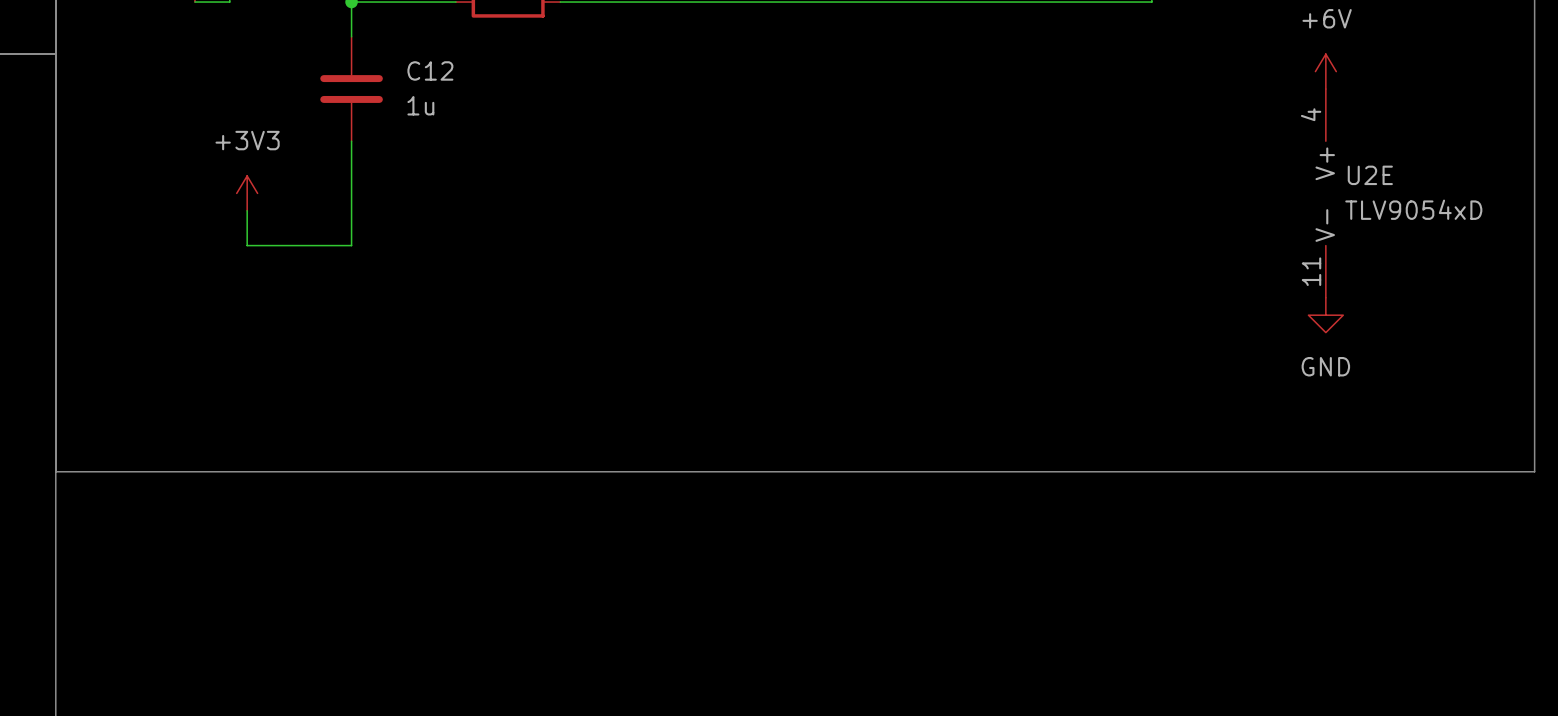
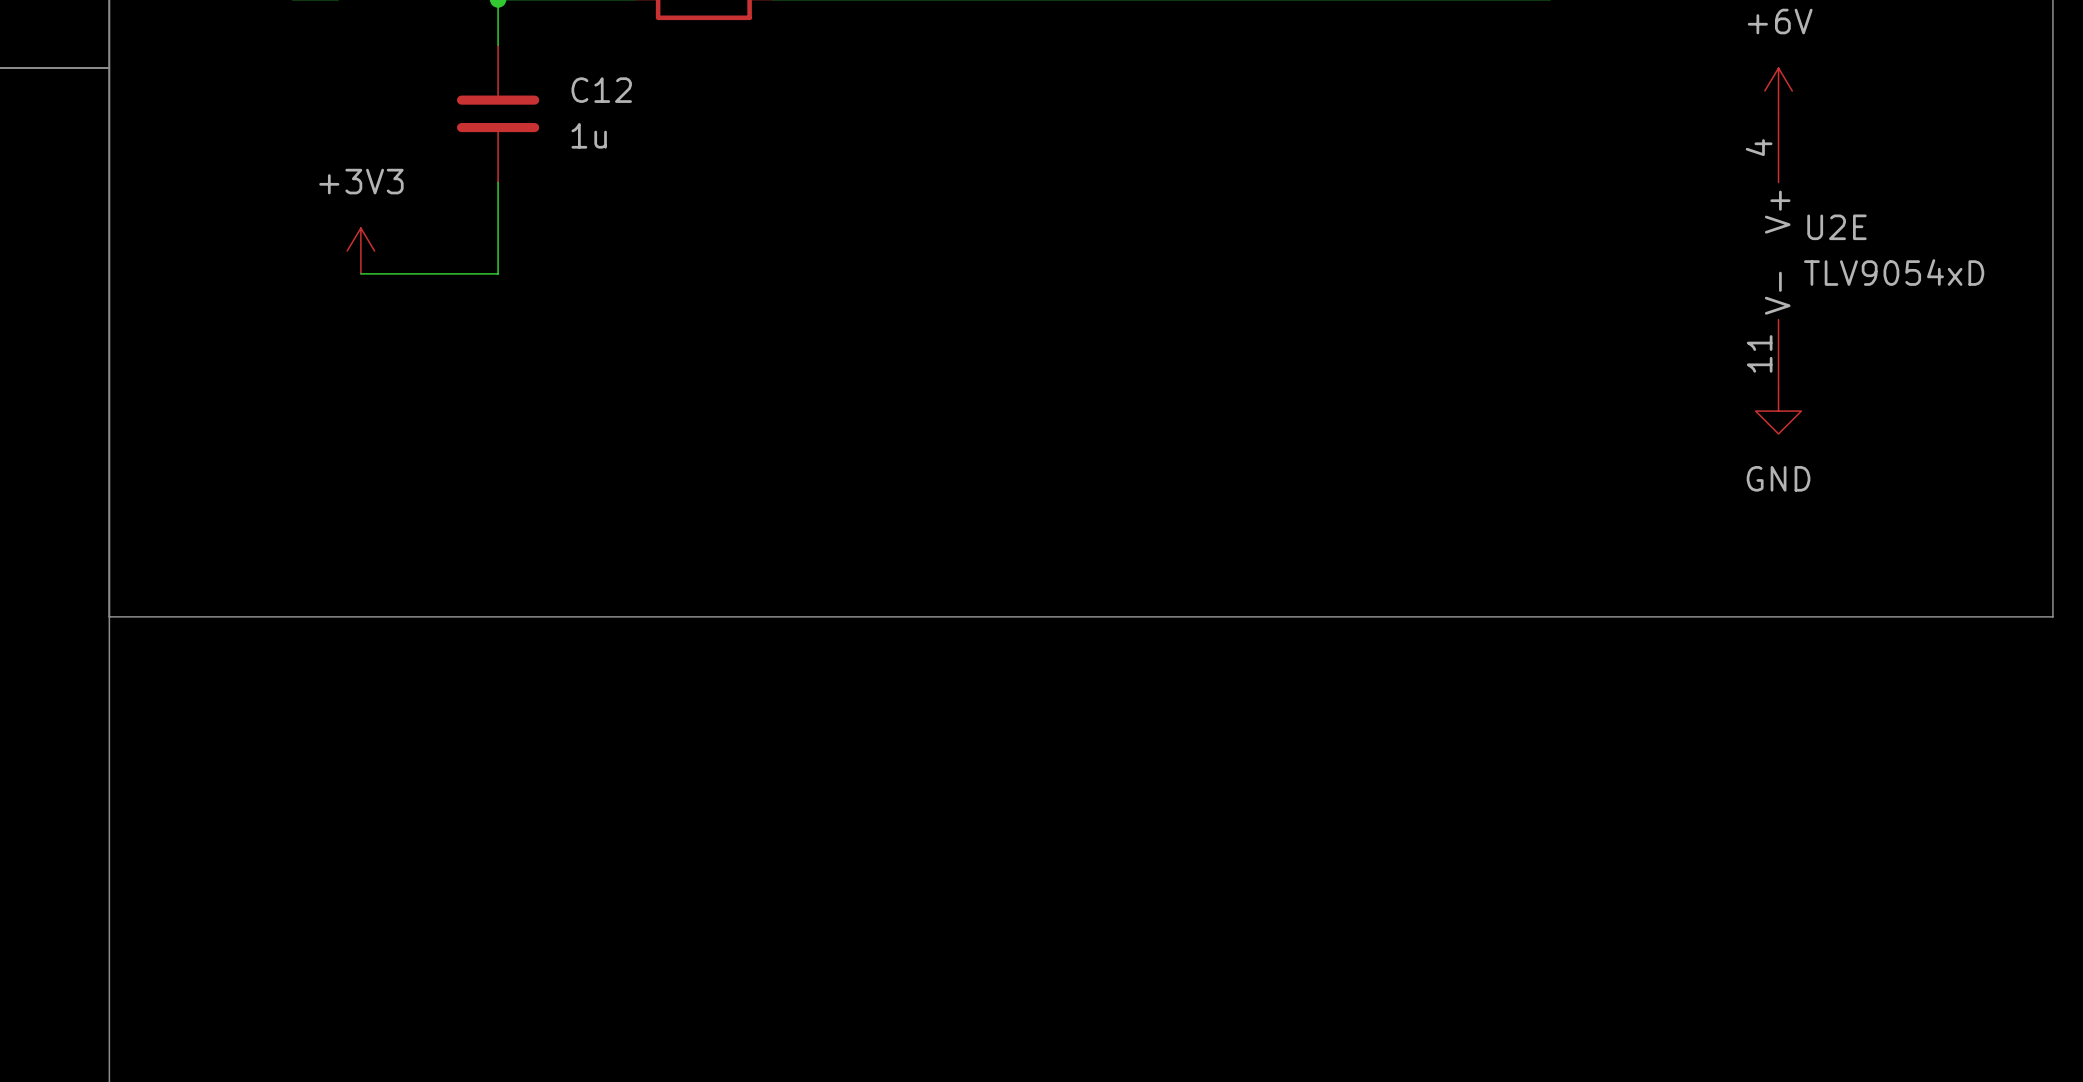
wire: (247, 210) (247, 245) (351, 245) (351, 210) -> (360, 273) (498, 273)

